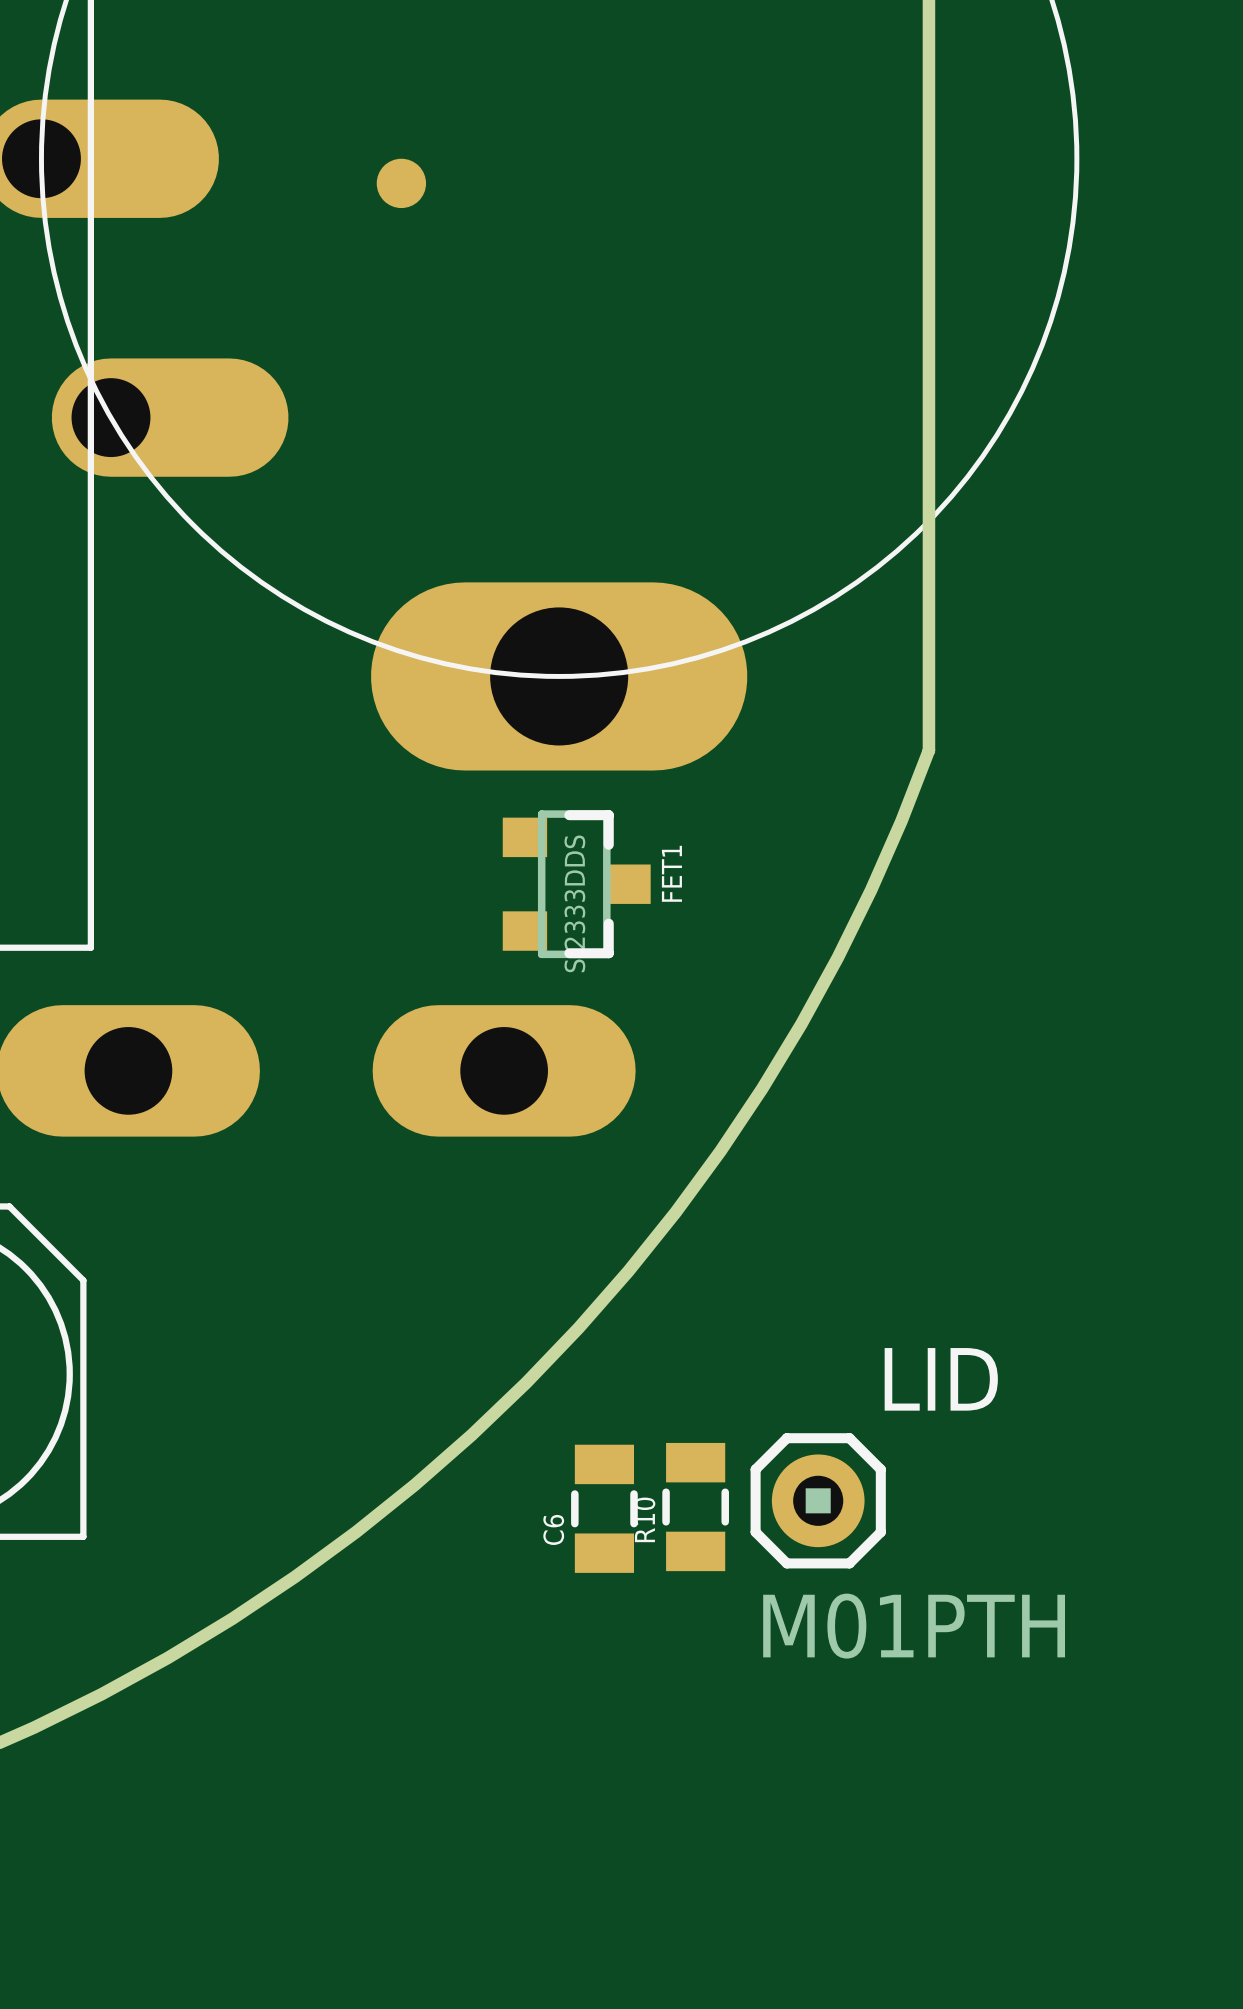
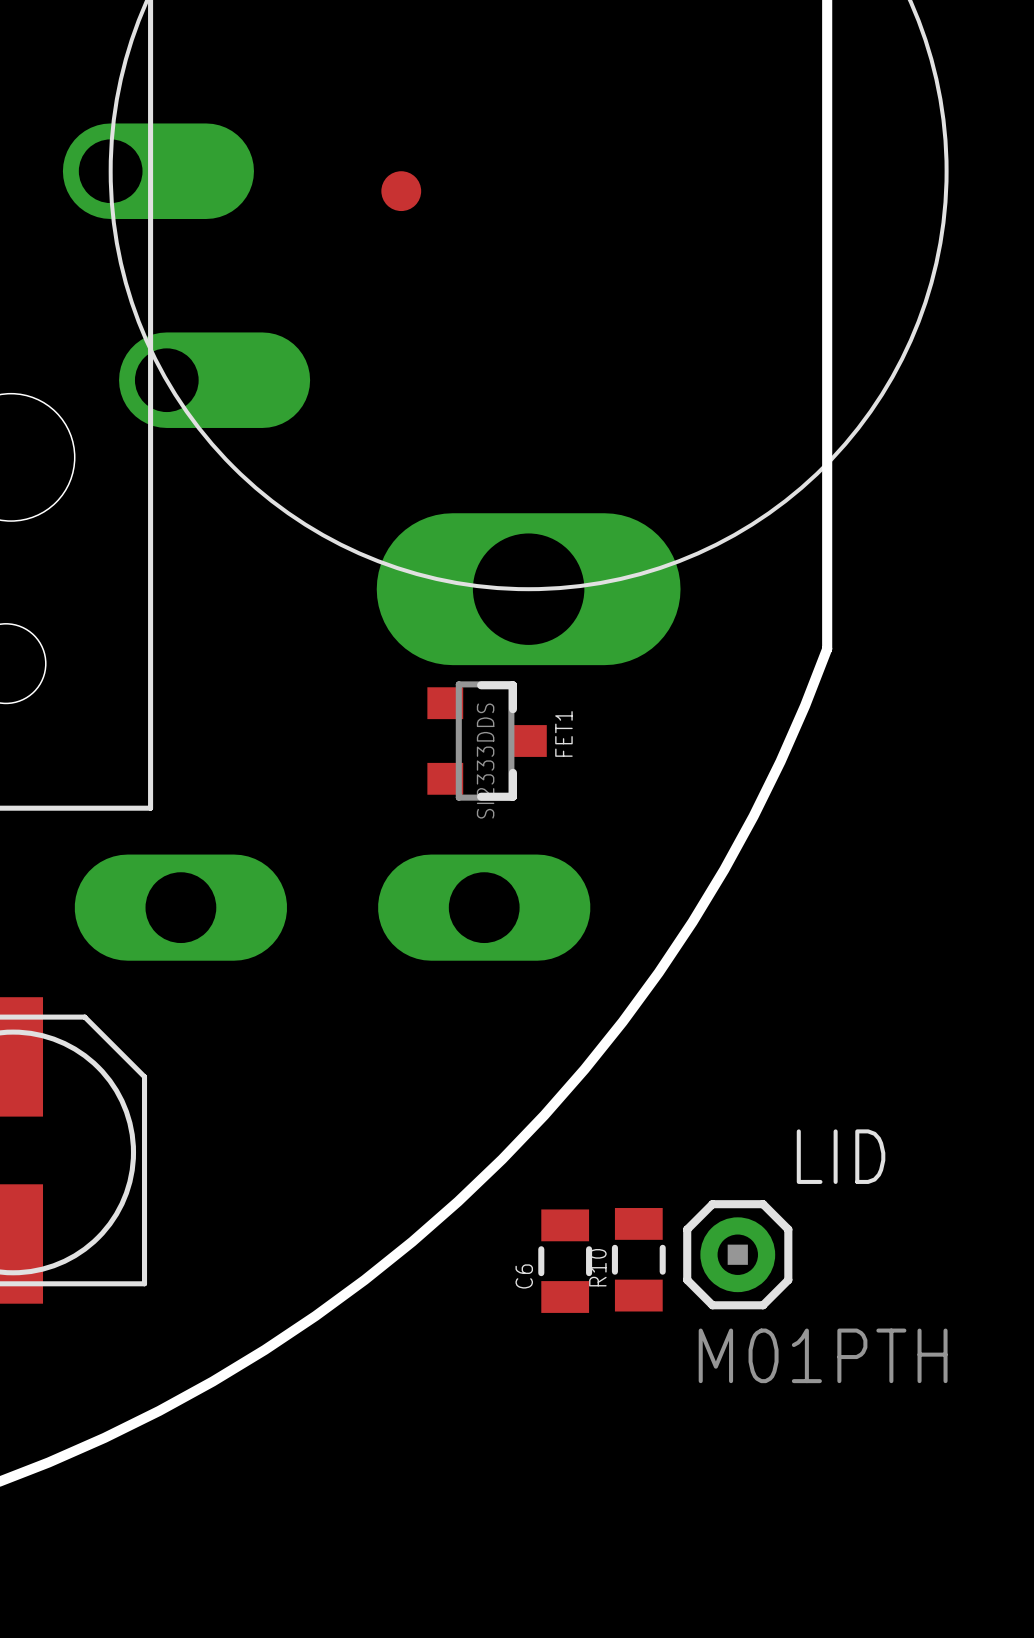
FET1 position: (576, 884) -> (487, 741)

